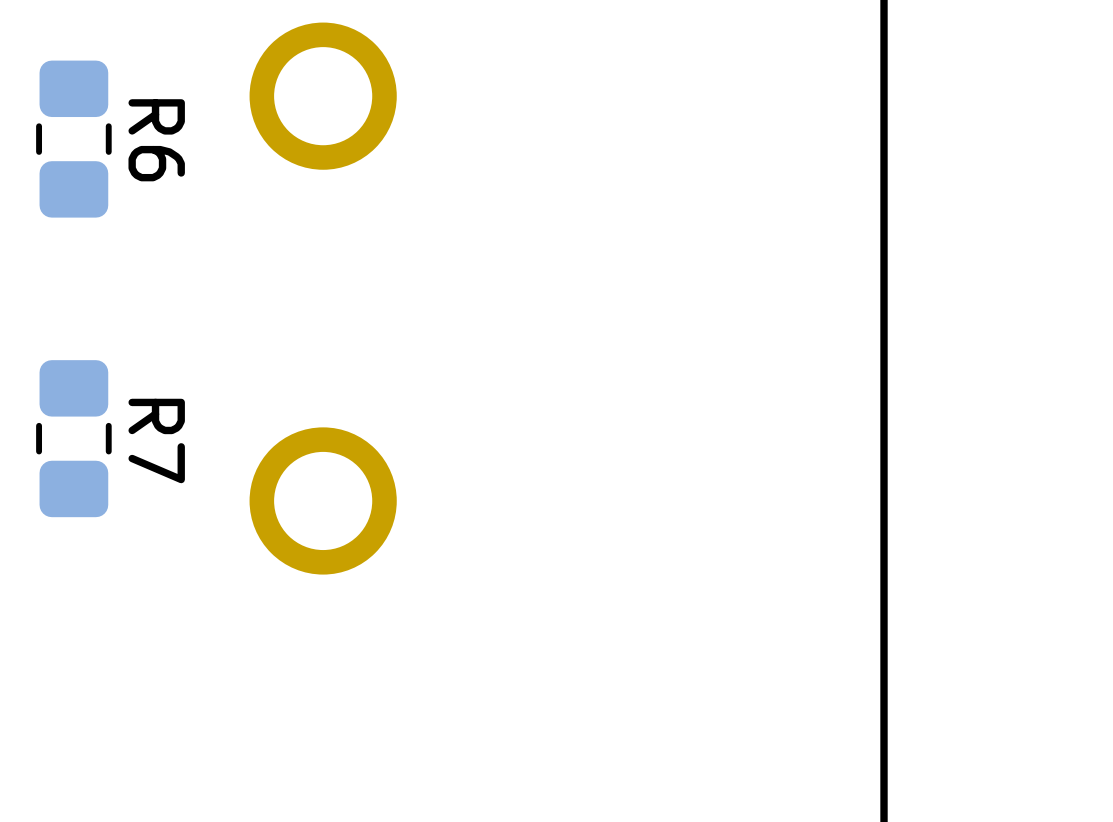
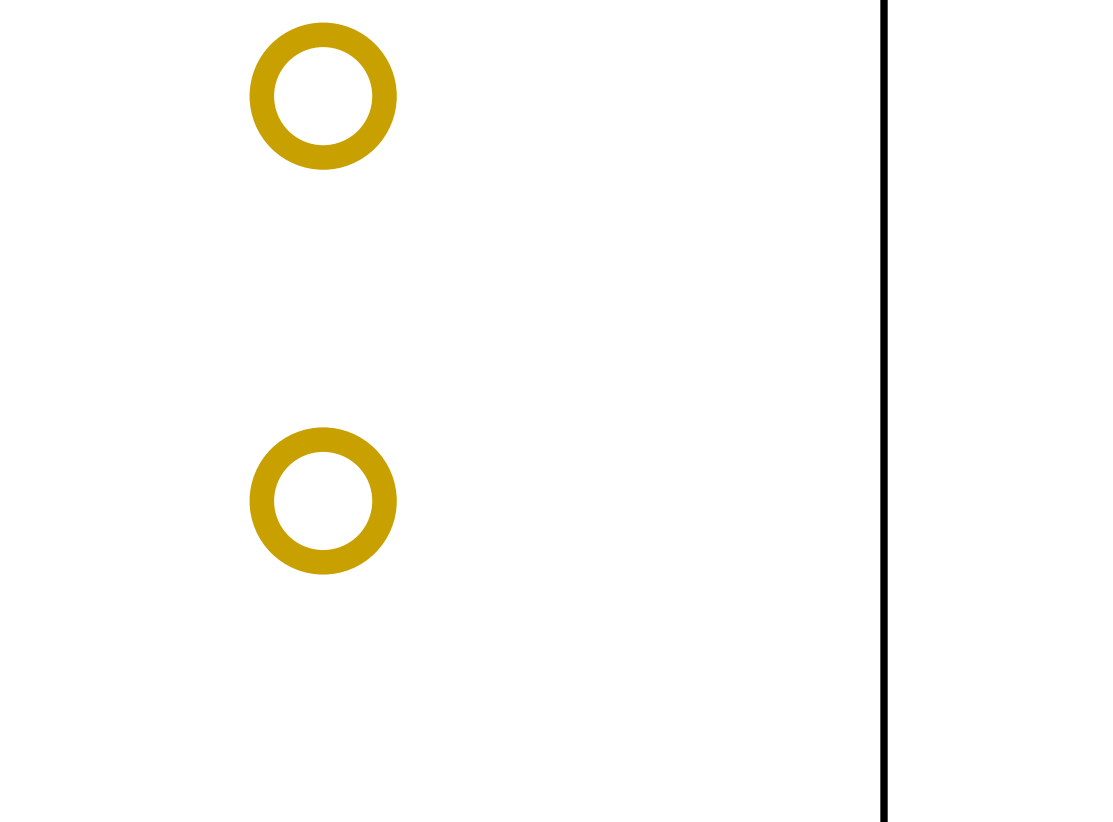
R6: (73, 139) -> none
R7: (73, 438) -> none

